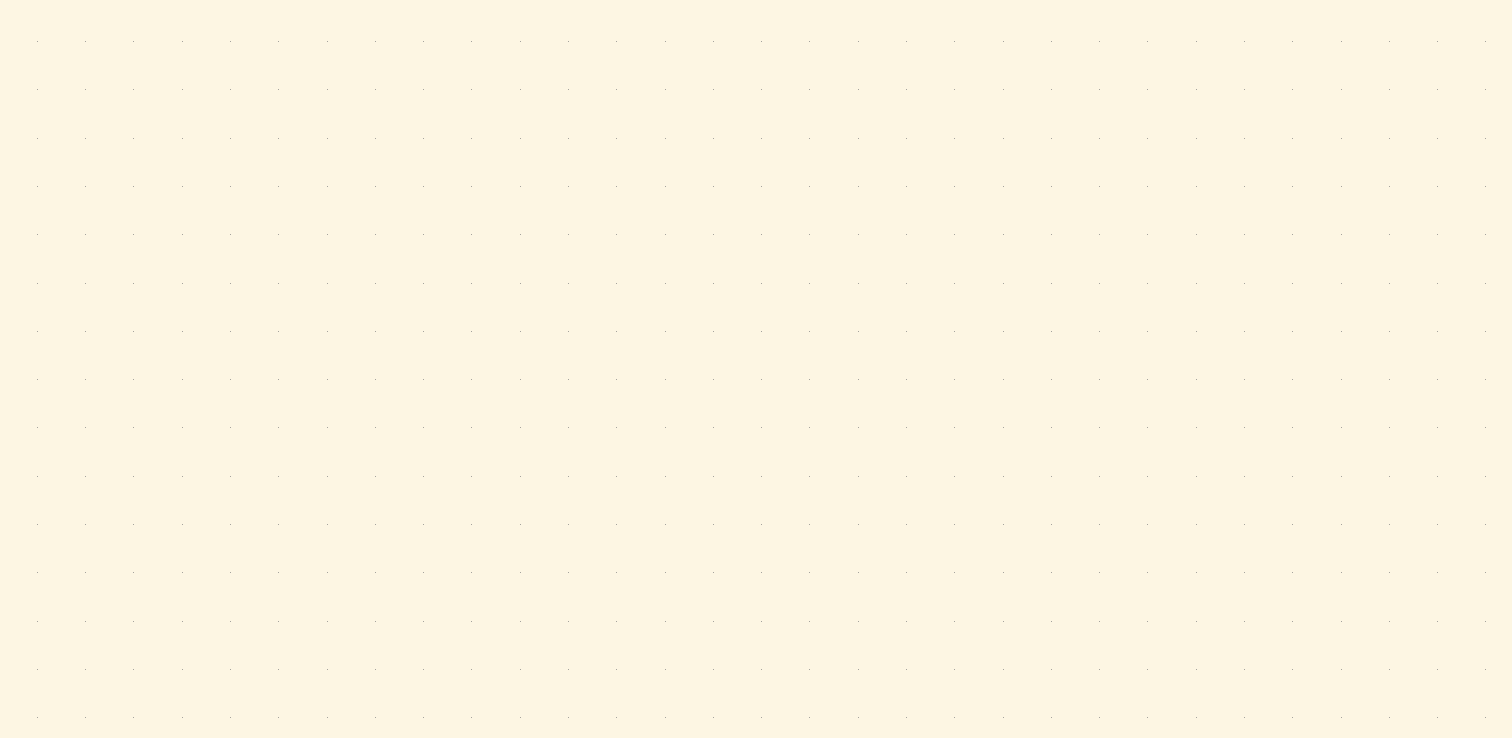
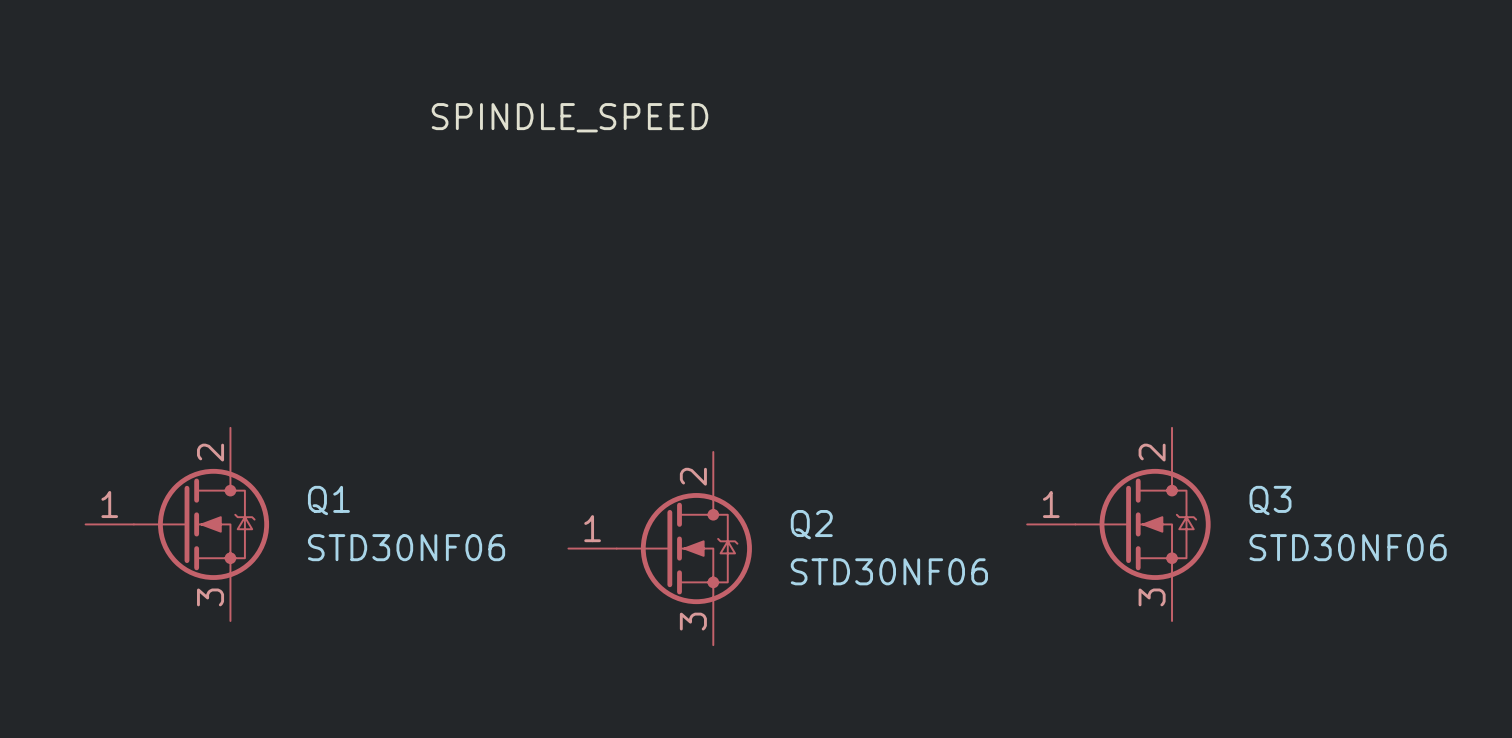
label: none -> SPINDLE_SPEED (569, 117)
Q1: none -> STD30NF06 (177, 524)
Q3: none -> STD30NF06 (1118, 524)
Q2: none -> STD30NF06 (660, 548)

